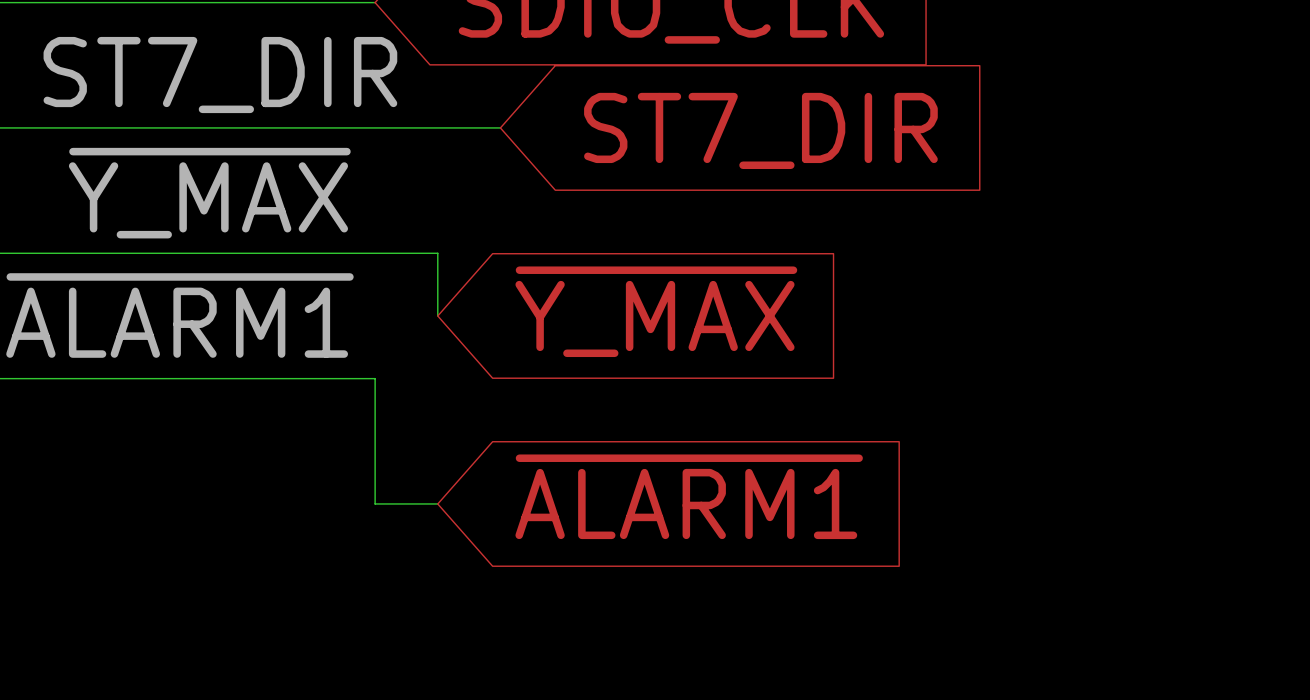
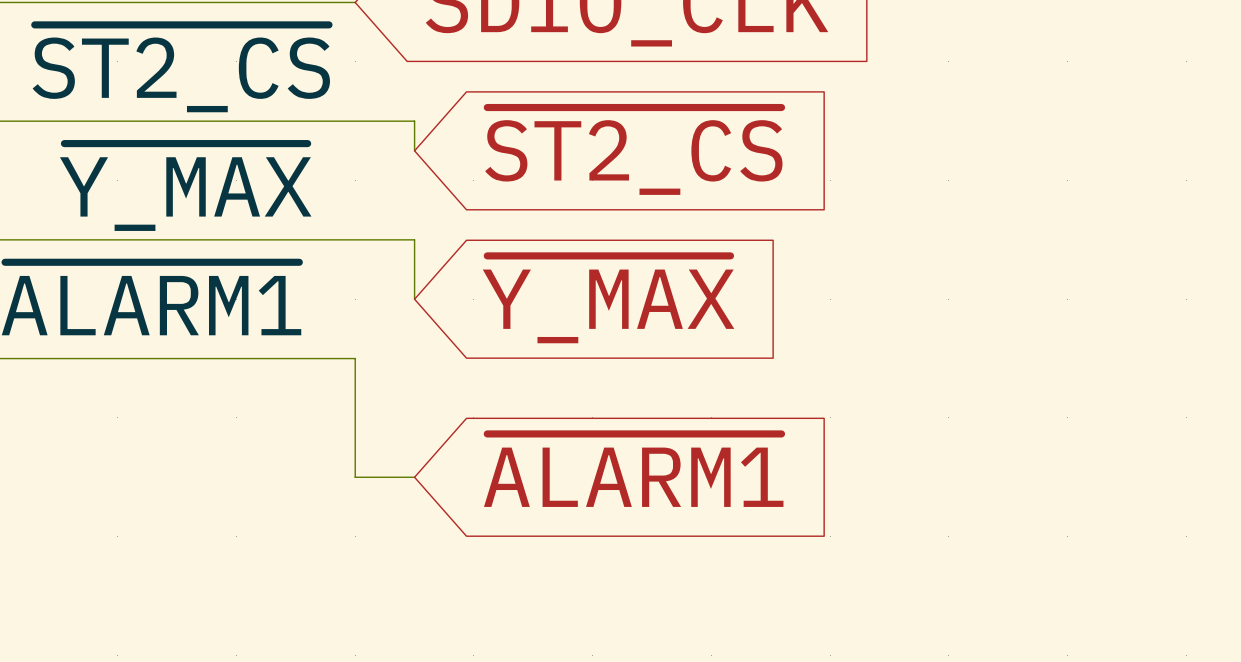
label: ST7_DIR (220, 75) -> ~{ST2_CS} (181, 68)
wire: (437, 127) (500, 127) -> (414, 121) (414, 150)
global label: ST7_DIR (760, 130) -> none
global label: none -> ~{ST2_CS} (633, 151)

